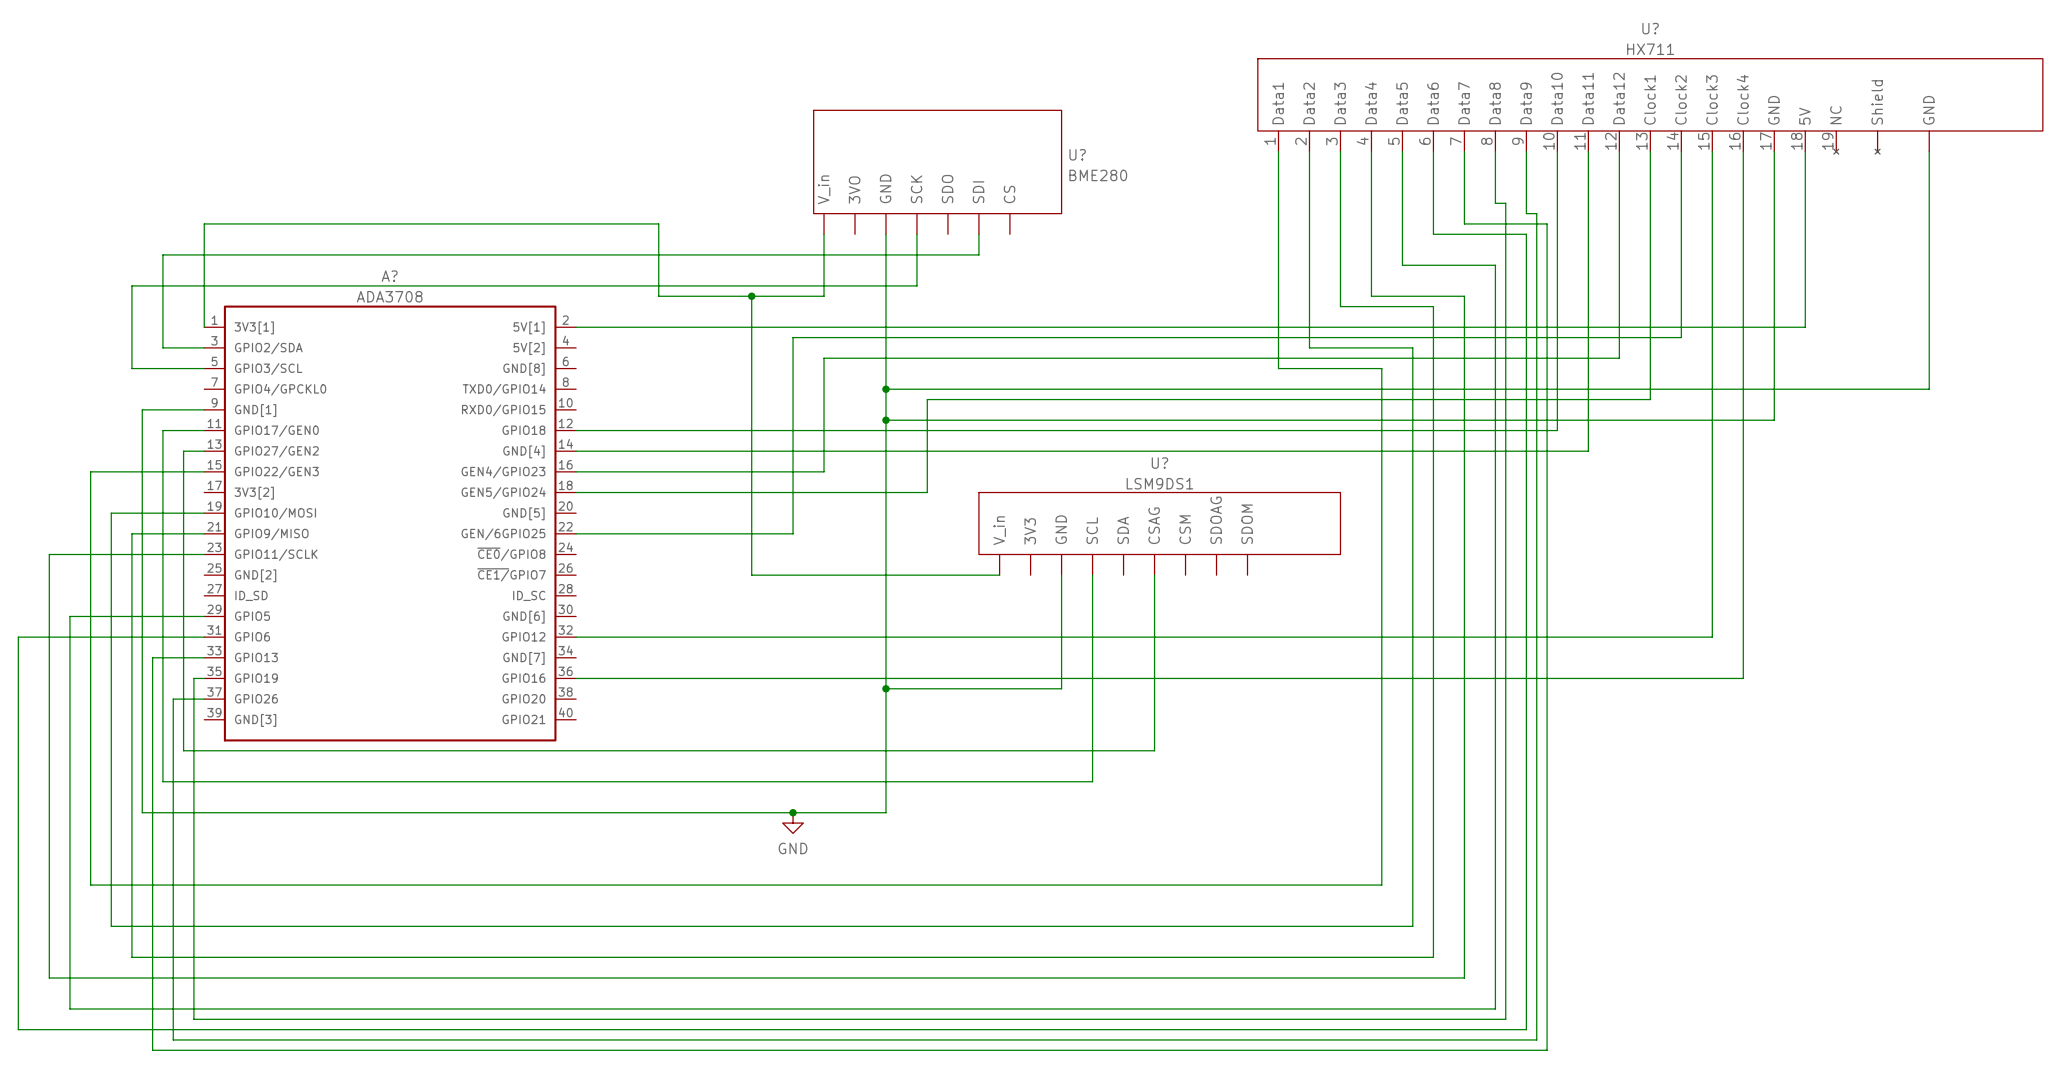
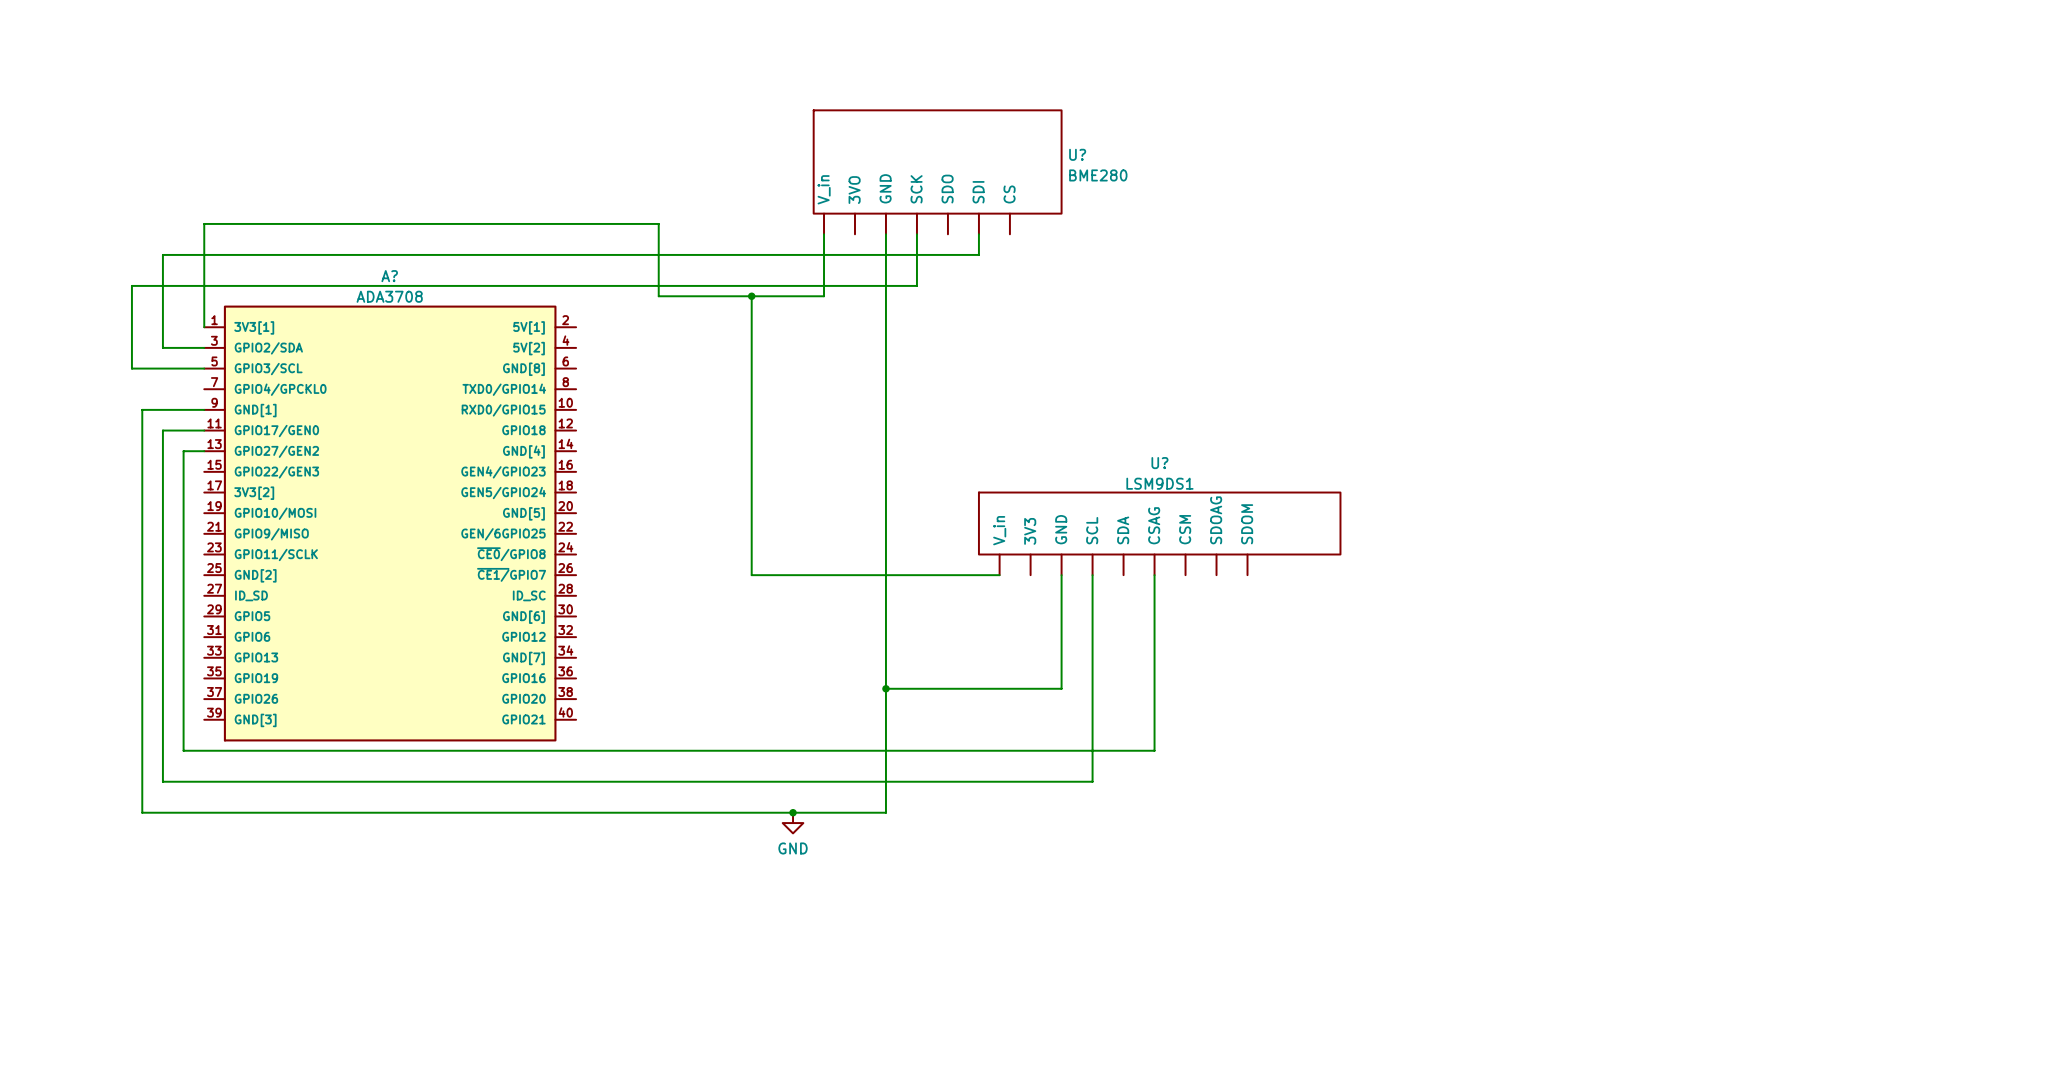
U?: HX711 (1650, 106) -> none
wire: (1278, 151) (1278, 368) (1381, 368) (1381, 885) (90, 885) (90, 471) (204, 471) -> none
wire: (1309, 151) (1309, 347) (1412, 347) (1412, 926) (111, 926) (111, 513) (204, 513) -> none
wire: (1340, 151) (1340, 306) (1433, 306) (1433, 957) (131, 957) (131, 533) (204, 533) -> none
wire: (1371, 151) (1371, 296) (1464, 296) (1464, 978) (49, 978) (49, 554) (204, 554) -> none
wire: (1402, 151) (1402, 265) (1495, 265) (1495, 1008) (69, 1008) (69, 616) (204, 616) -> none
wire: (1433, 151) (1433, 234) (1526, 234) (1526, 1029) (18, 1029) (18, 637) (204, 637) -> none
wire: (1464, 151) (1464, 223) (1547, 223) (1547, 1050) (152, 1050) (152, 657) (204, 657) -> none
wire: (1495, 151) (1495, 203) (1505, 203) (1505, 1019) (193, 1019) (193, 678) (204, 678) -> none
wire: (1526, 151) (1526, 213) (1536, 213) (1536, 1039) (173, 1039) (173, 699) (204, 699) -> none
wire: (1557, 151) (1557, 430) (576, 430) -> none
wire: (1588, 151) (1588, 451) (576, 451) -> none
wire: (1619, 151) (1619, 358) (824, 358) (824, 471) (576, 471) -> none
wire: (1650, 151) (1650, 399) (927, 399) (927, 492) (576, 492) -> none
wire: (1681, 151) (1681, 337) (793, 337) (793, 533) (576, 533) -> none
wire: (1712, 151) (1712, 637) (576, 637) -> none
wire: (1743, 151) (1743, 678) (576, 678) -> none
wire: (1774, 151) (1774, 420) (885, 420) -> none
wire: (1805, 151) (1805, 327) (576, 327) -> none
wire: (1929, 151) (1929, 389) (885, 389) -> none
junction: (885, 389) -> none
junction: (885, 420) -> none

